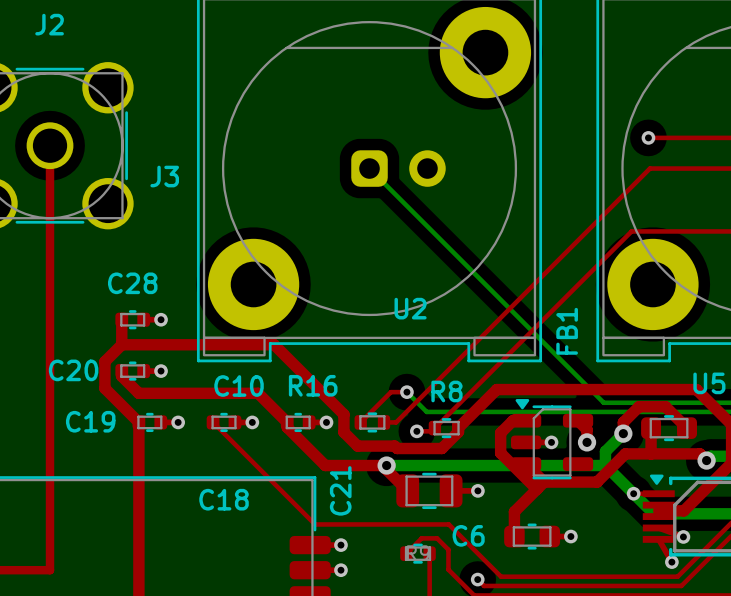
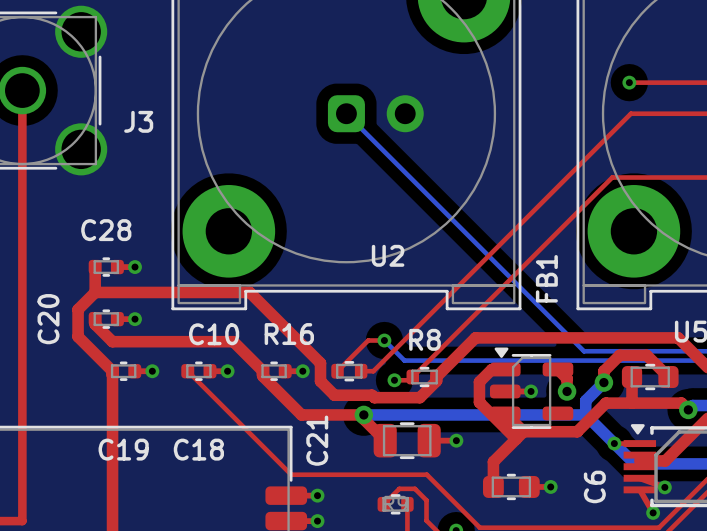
C20 name rotation: 0° (73, 370) -> 90° counterclockwise (48, 319)
C19 name position: C19 (90, 421) -> C19 (123, 449)
C6 name rotation: 0° (468, 535) -> 90° counterclockwise (594, 486)
C6 name position: C6 (468, 535) -> C6 (594, 486)

